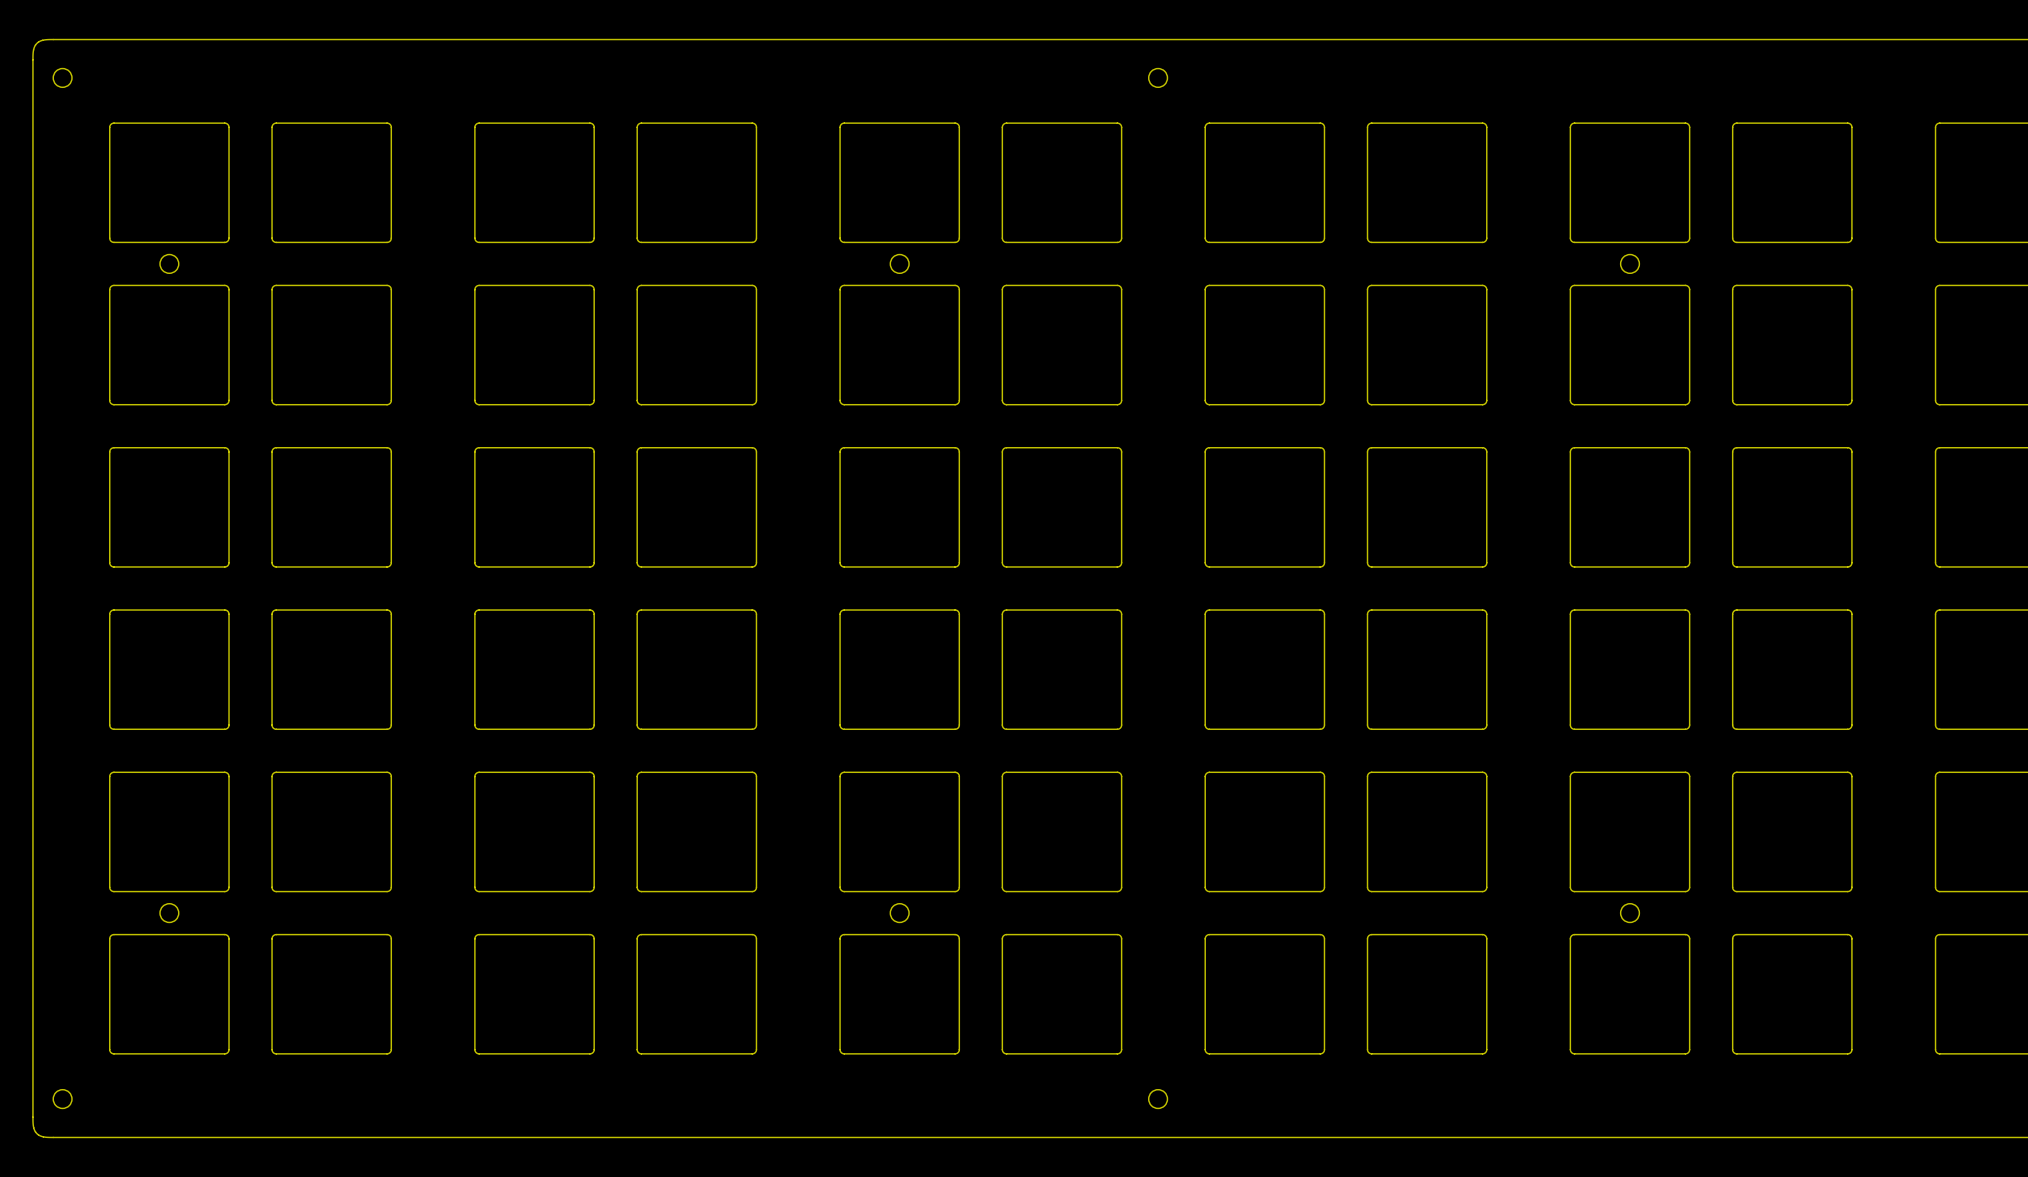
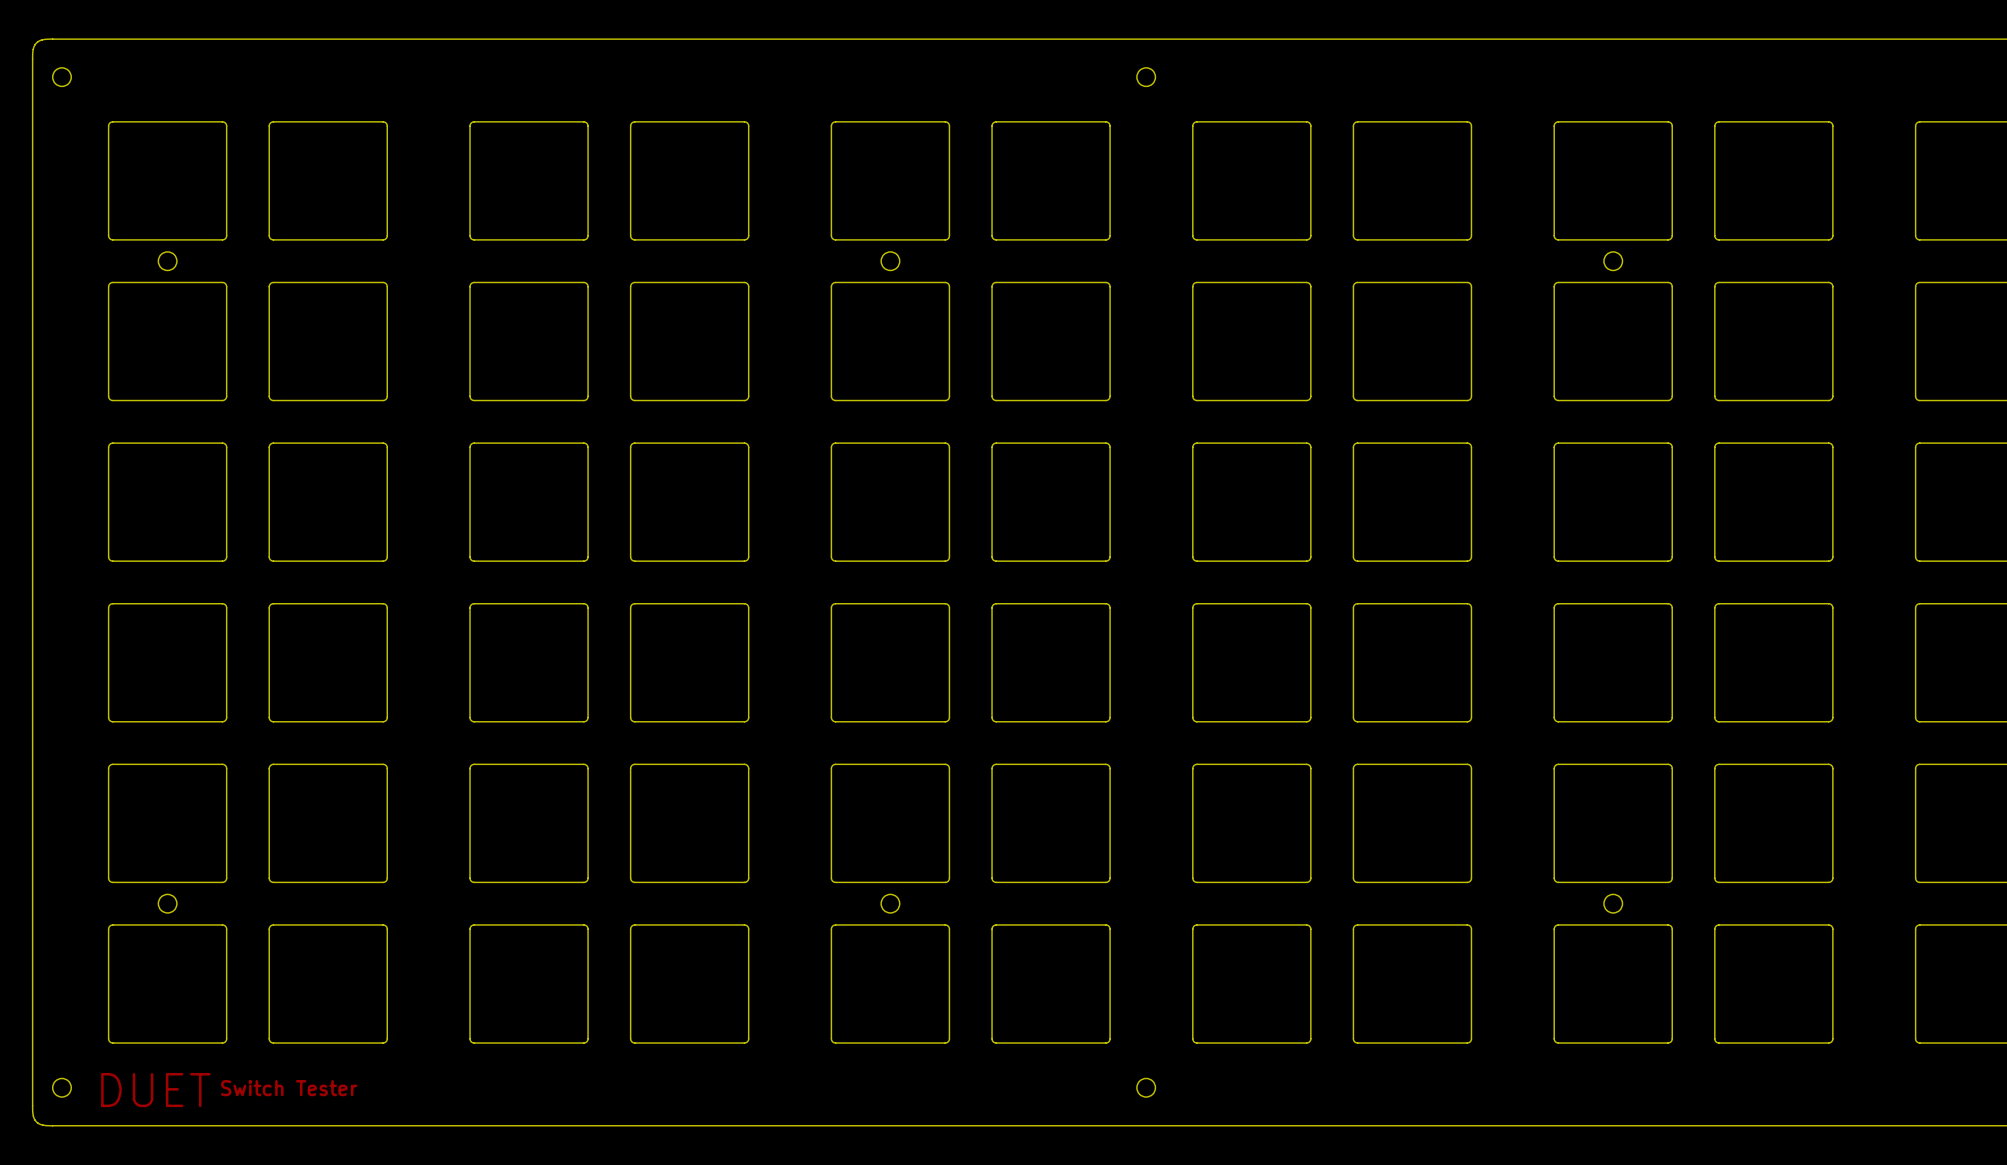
text: none -> Switch Tester (289, 1088)
text: none -> DUET (155, 1090)

